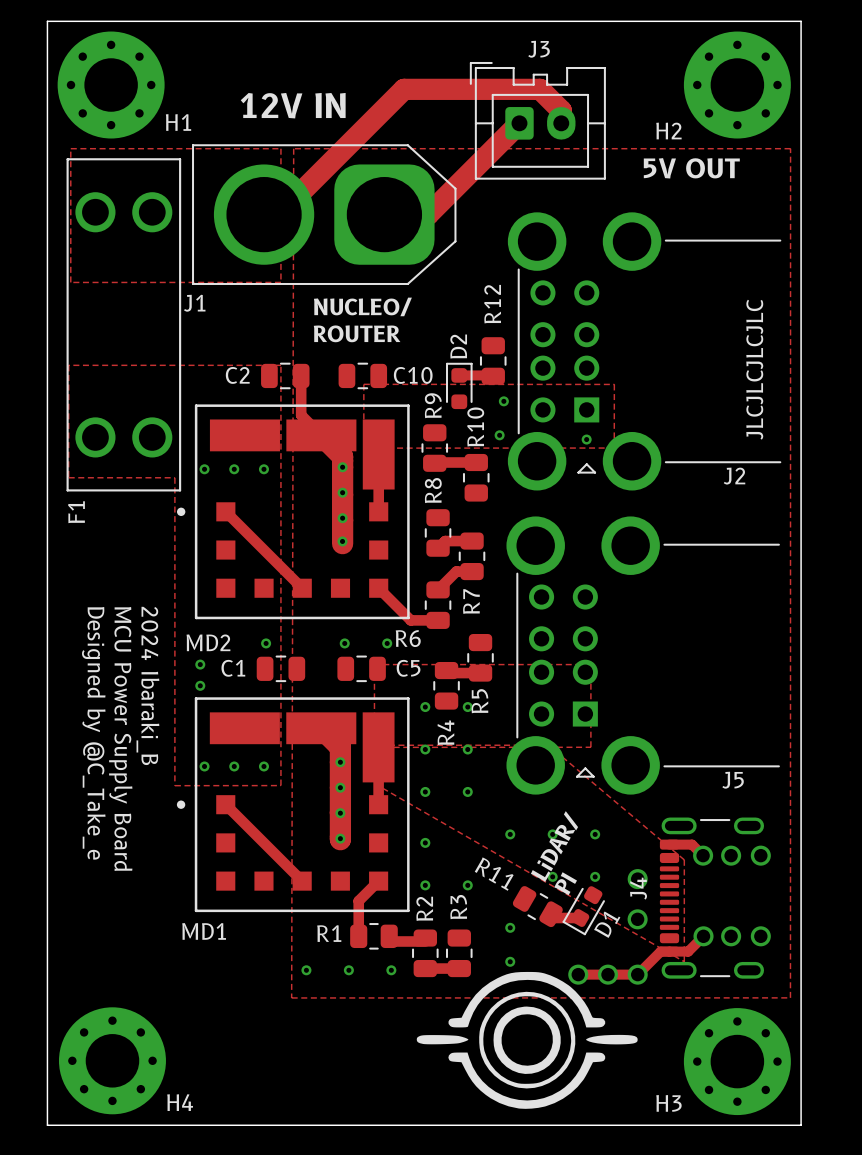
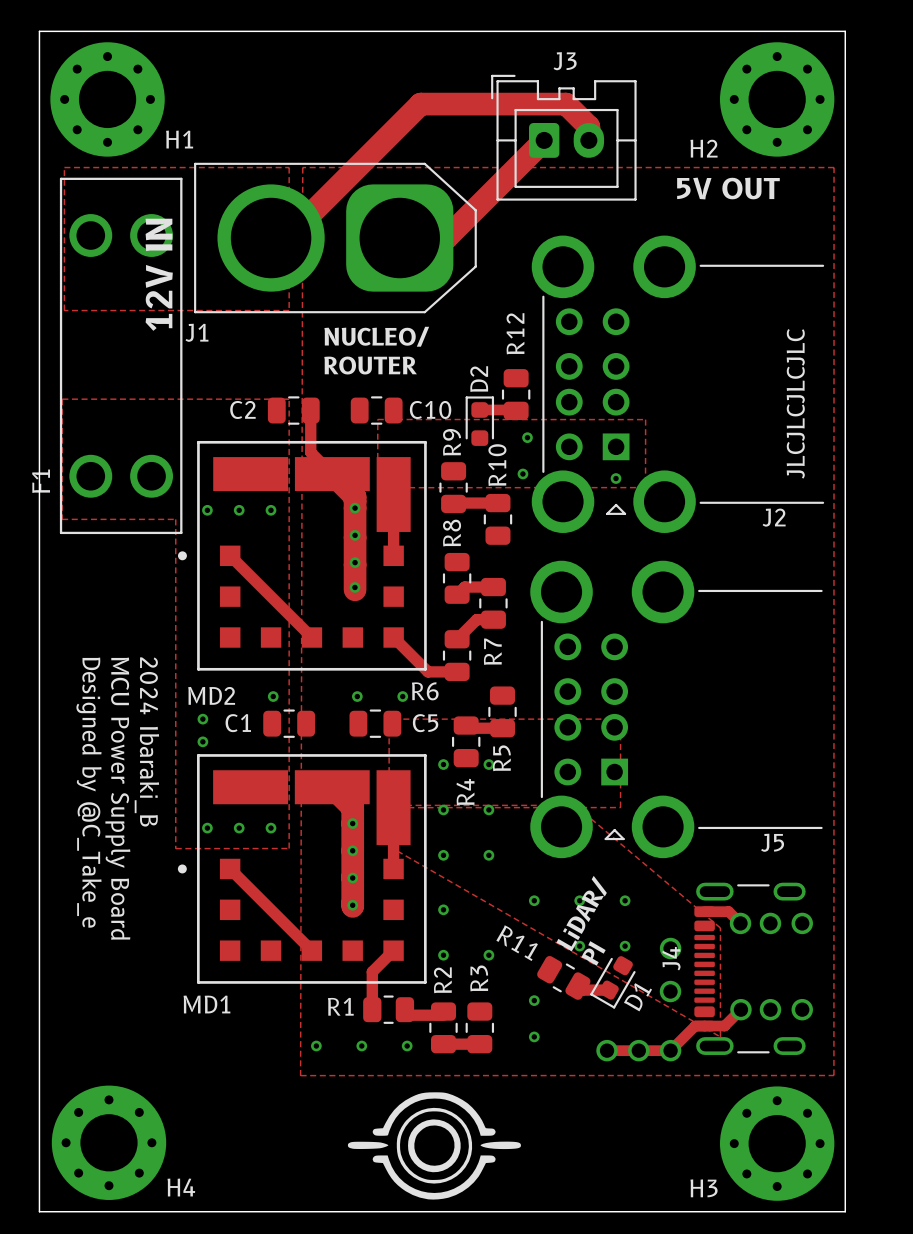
text rotation: 0° (293, 105) -> 90° counterclockwise (159, 274)
text position: 12V IN (293, 105) -> 12V IN (159, 274)
F1 name position: F1 (76, 512) -> F1 (41, 481)
drawing: [416, 971, 638, 1109] -> none
drawing: none -> [347, 1092, 521, 1200]

